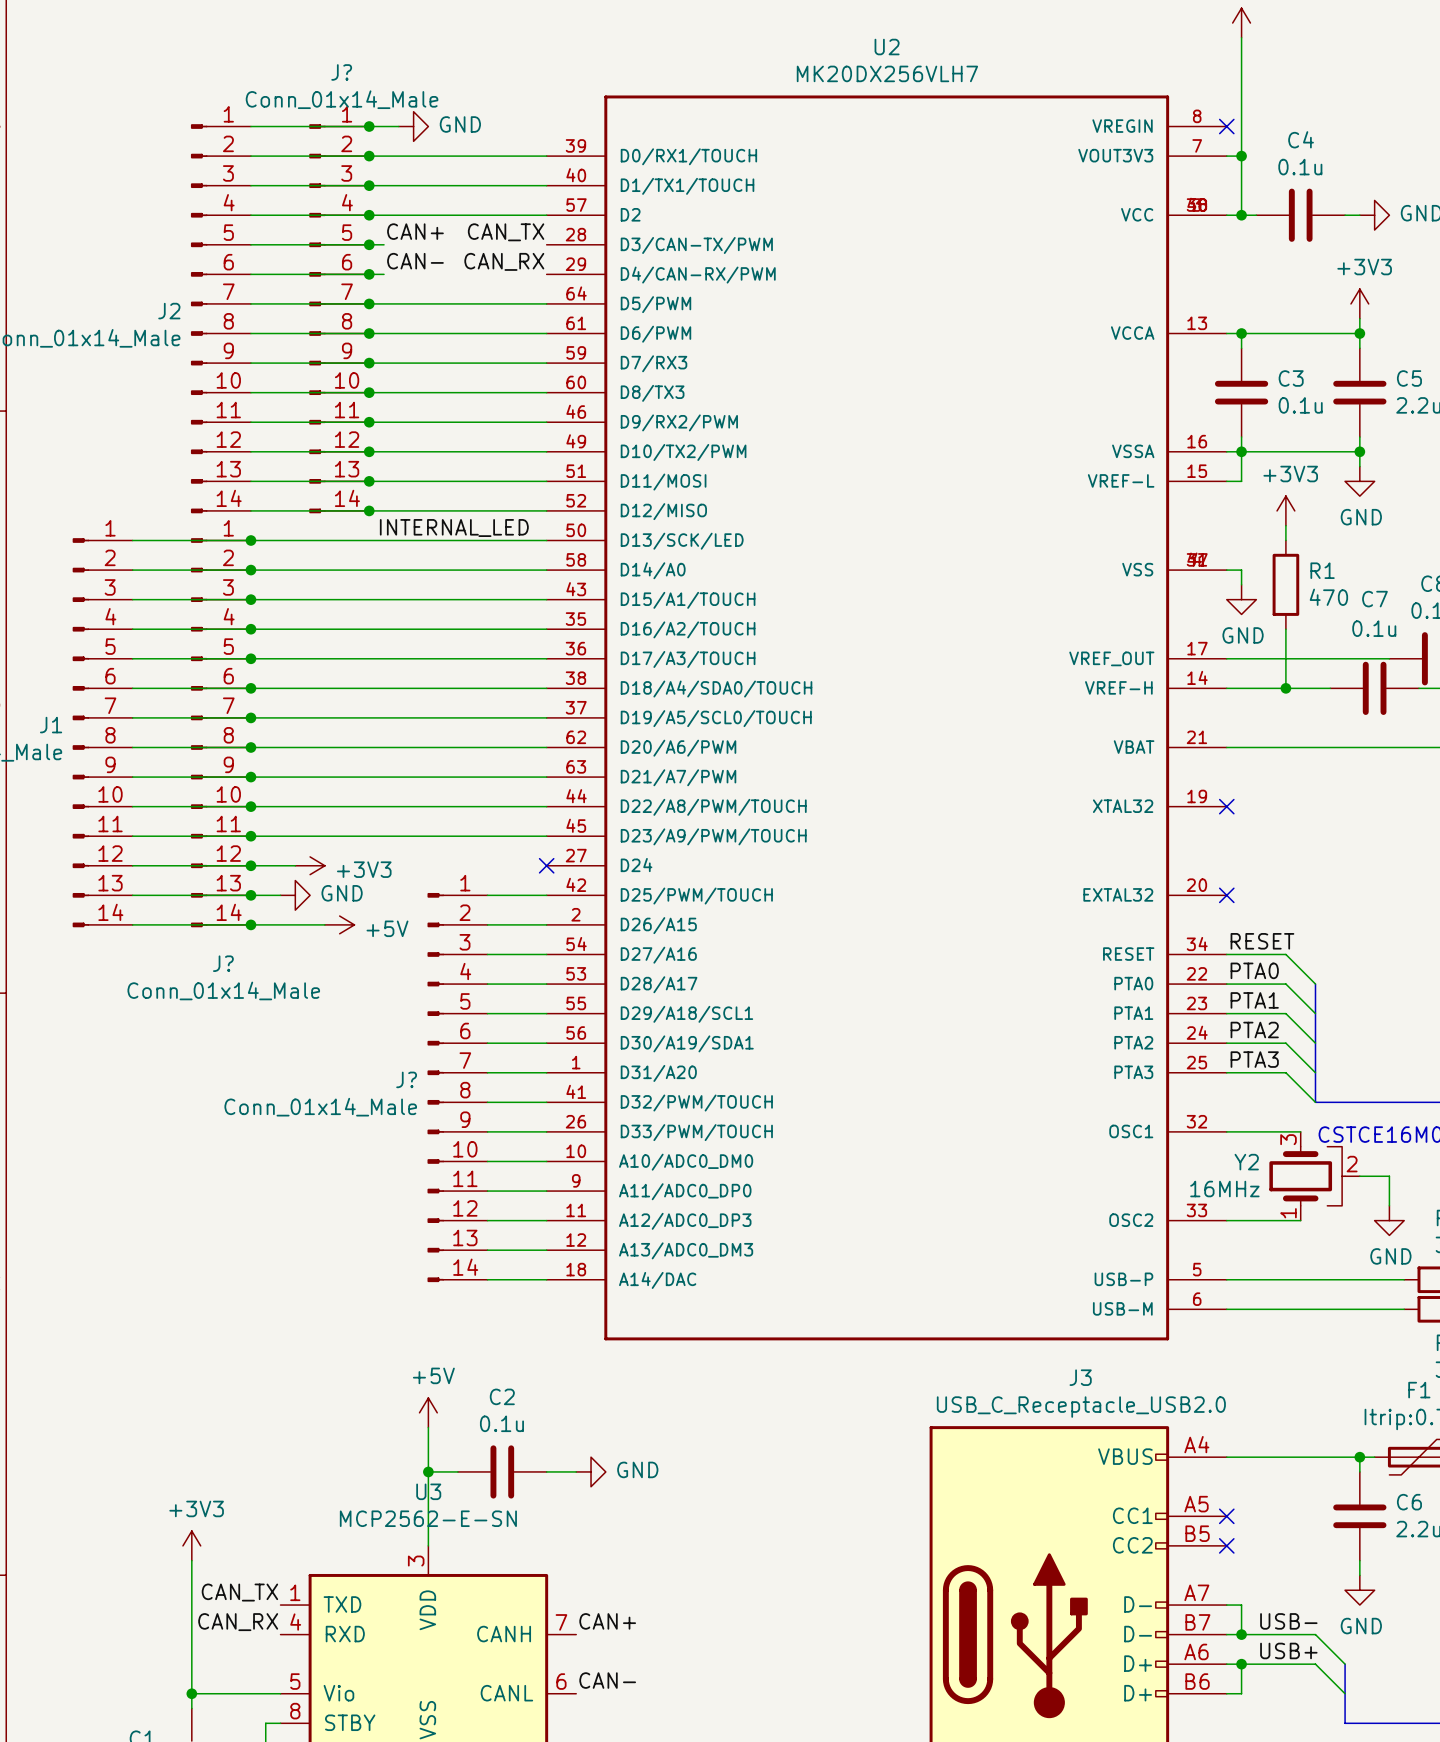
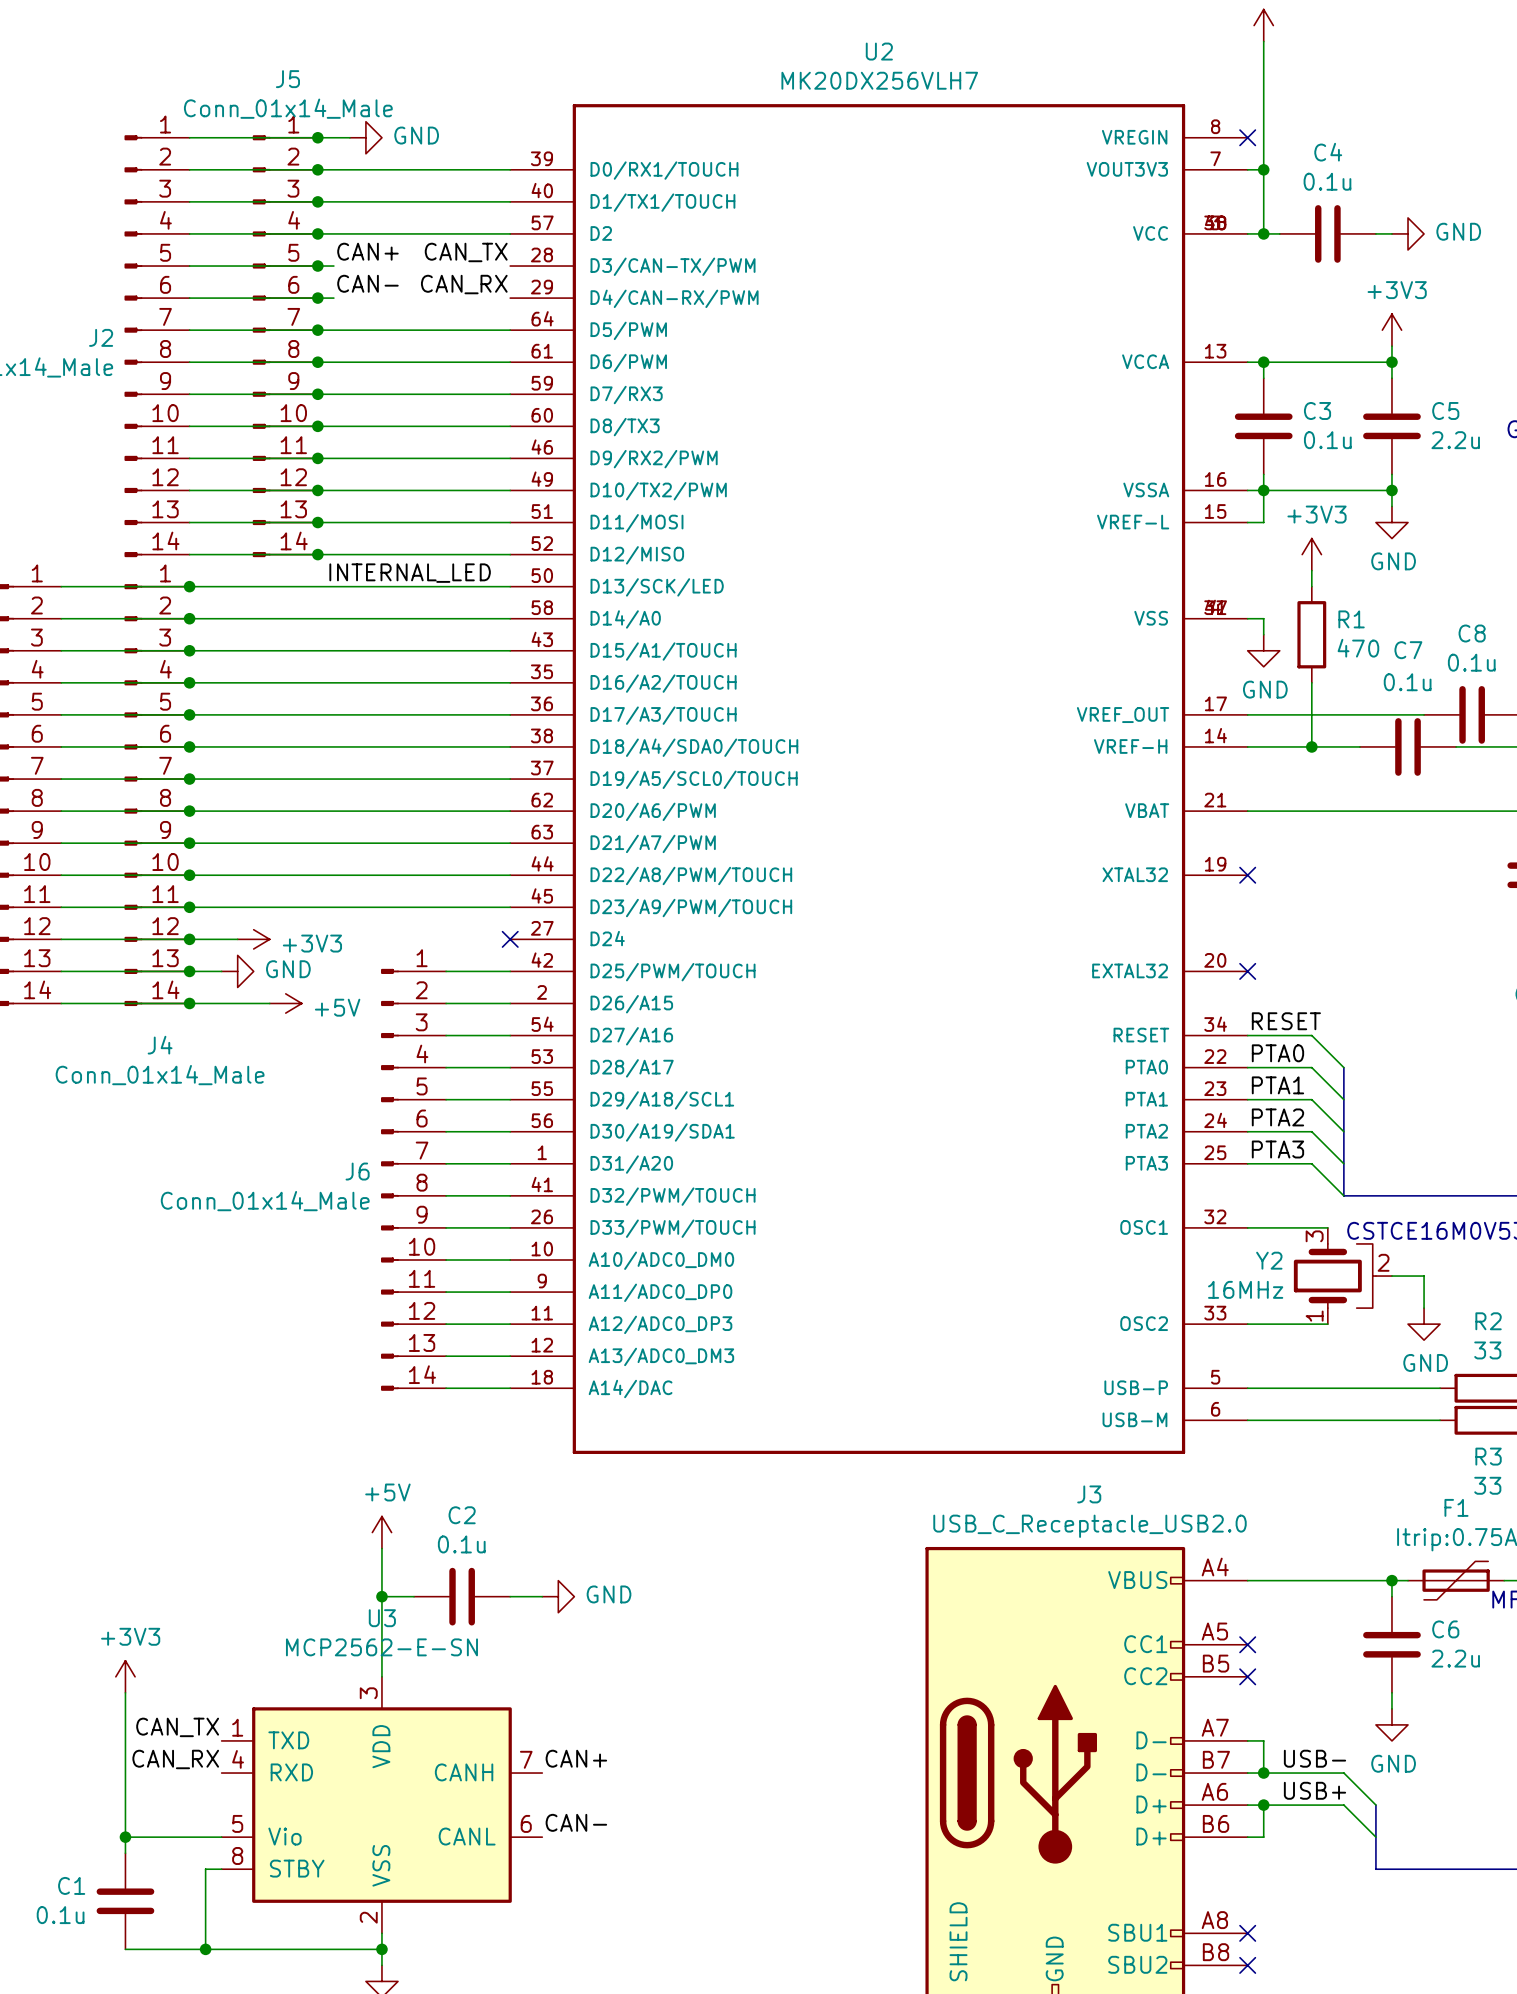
J? name: J? (341, 72) -> J5 (287, 79)
J? name: J? (223, 963) -> J4 (160, 1045)
J? name: J? (406, 1079) -> J6 (357, 1171)

